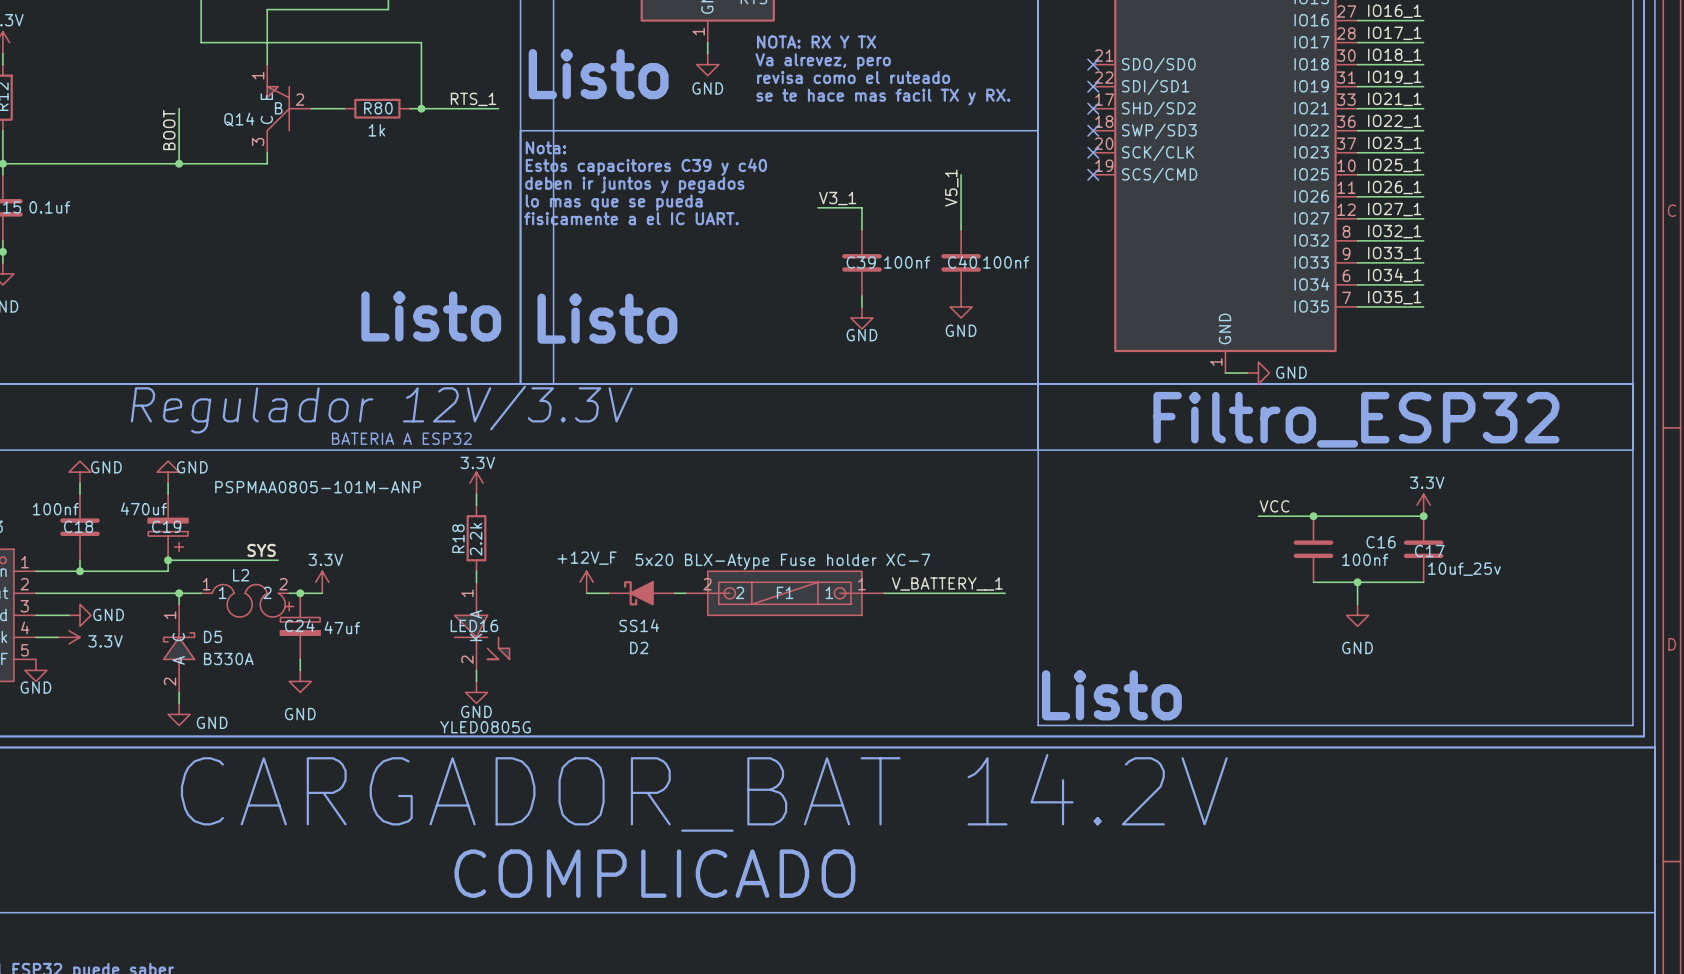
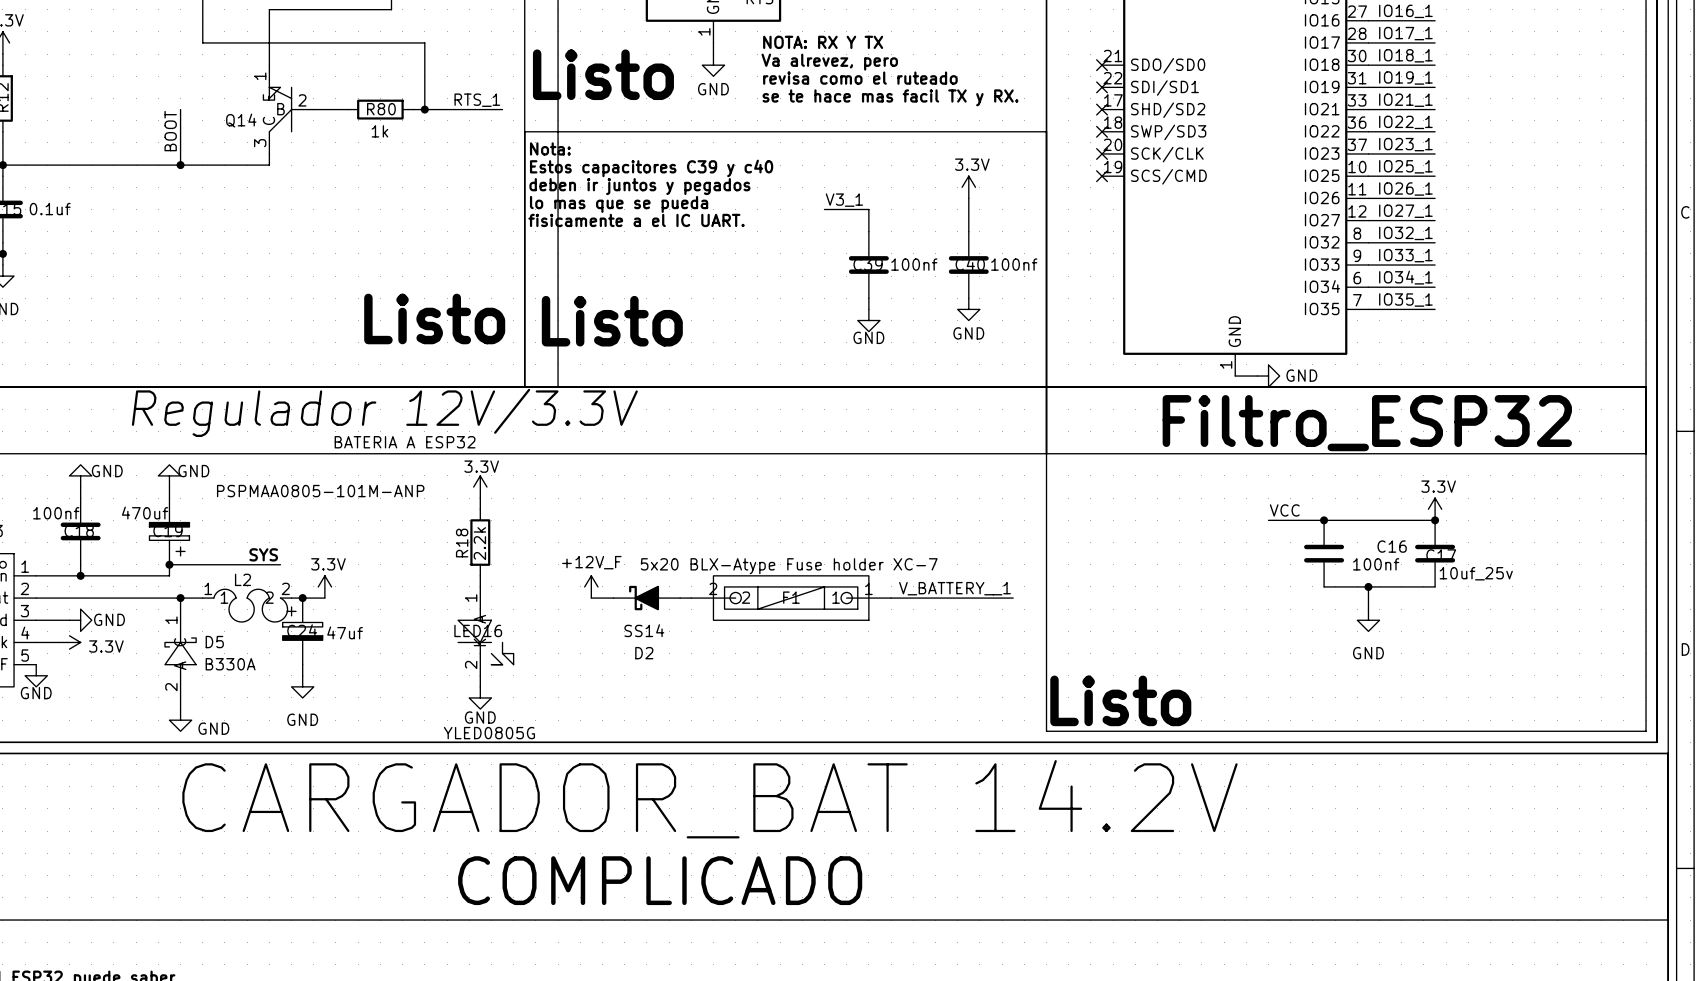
power symbol: none -> 3.3V (968, 187)
label: V5_1 (951, 188) -> none

